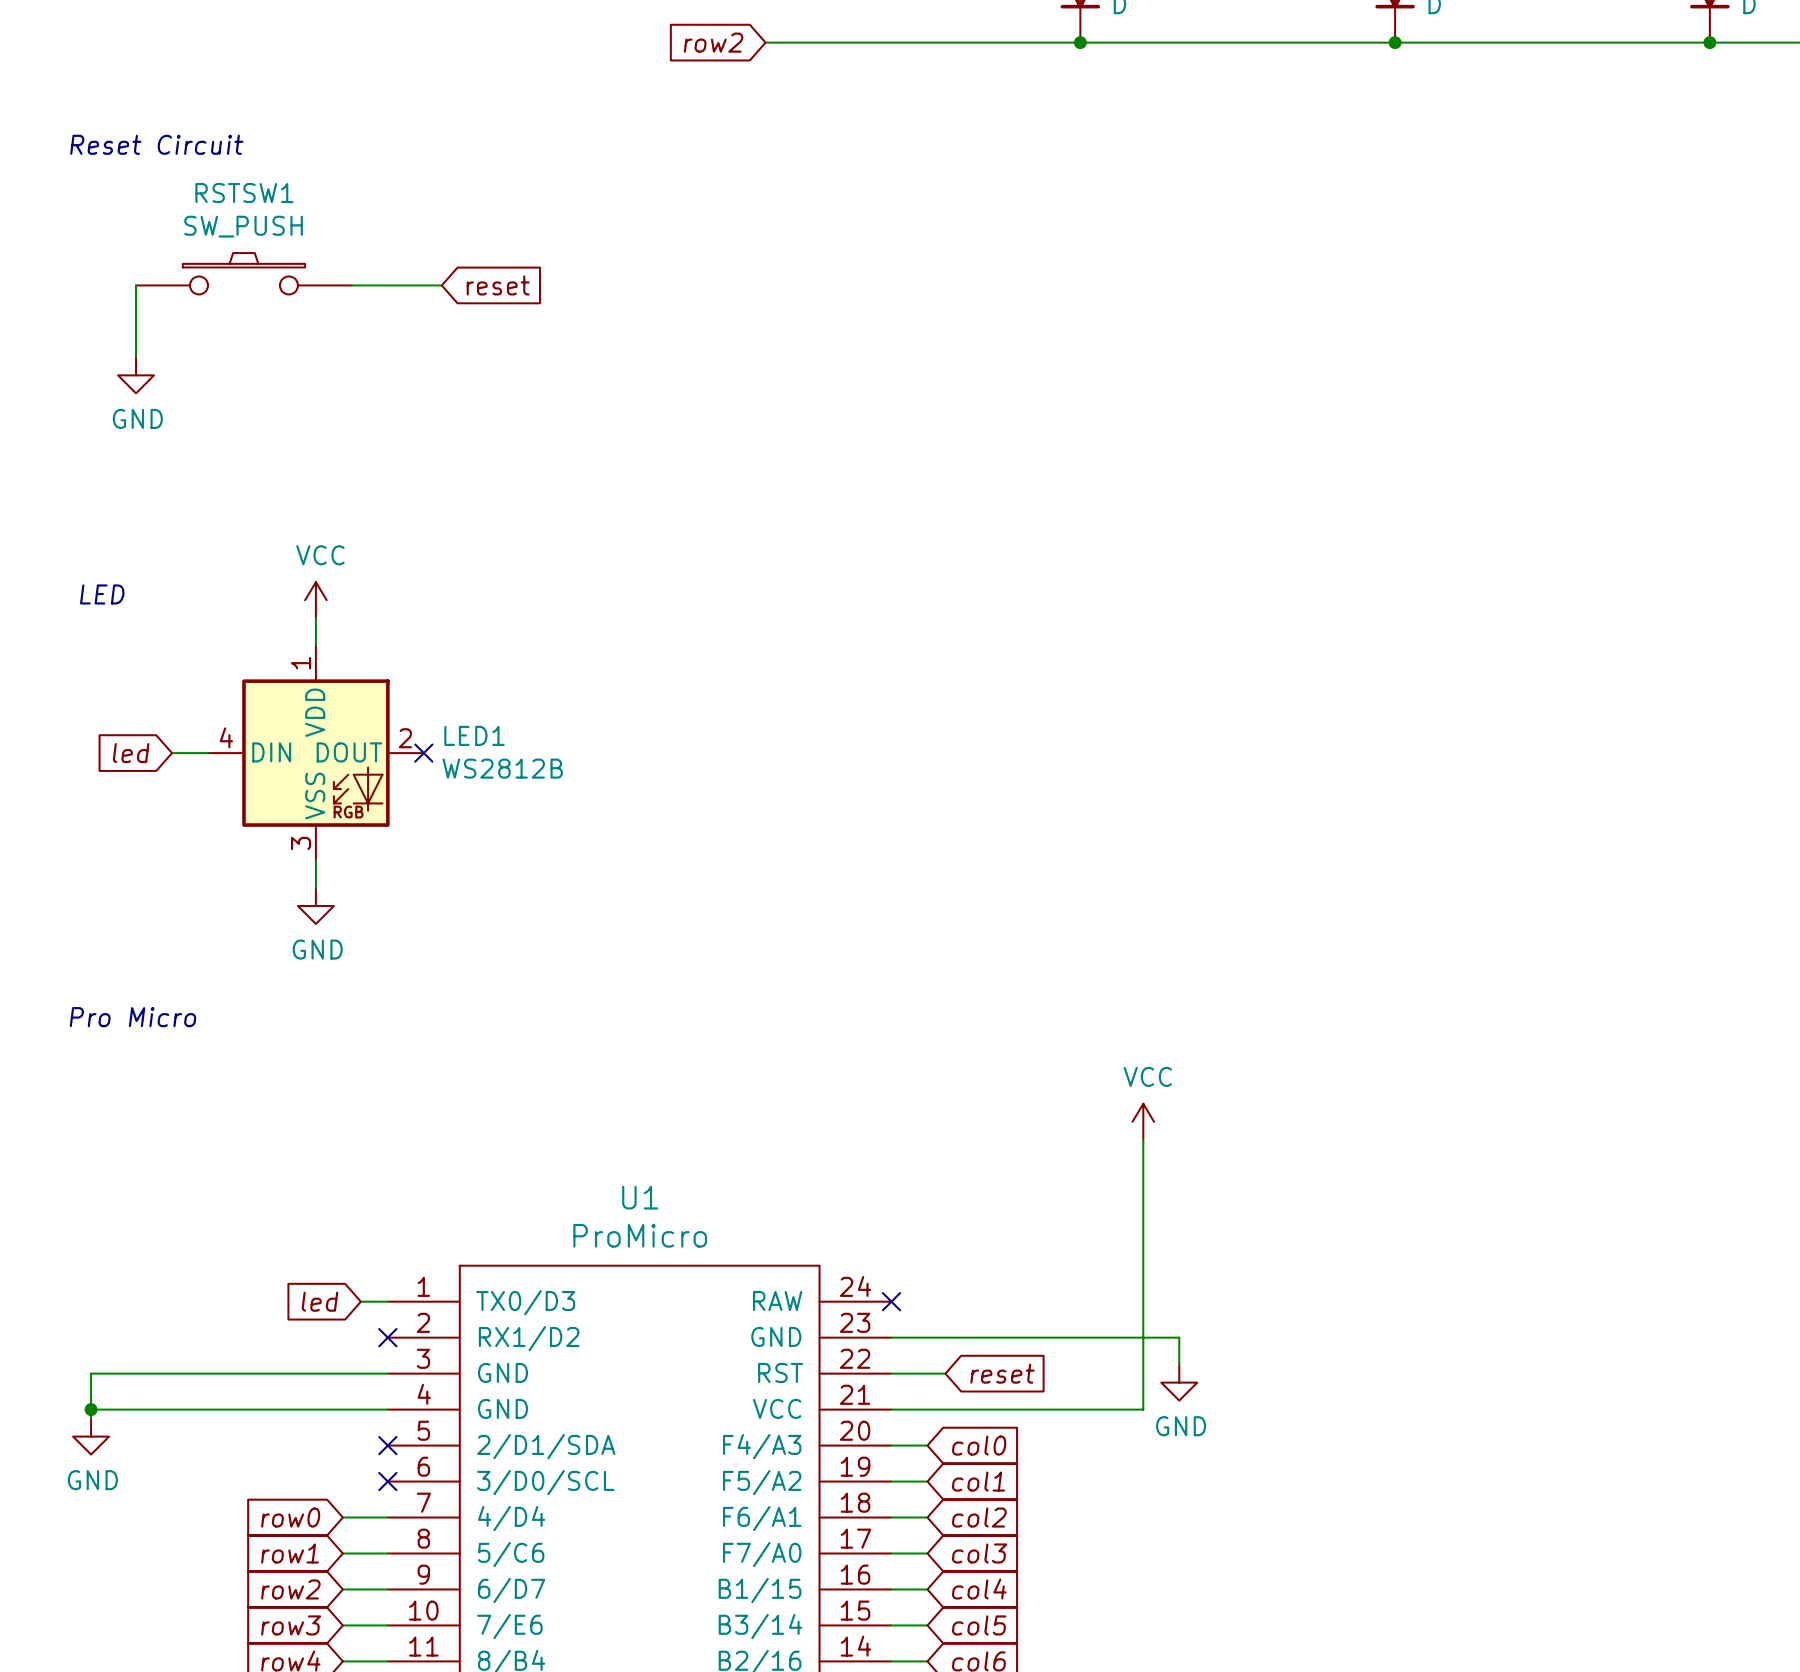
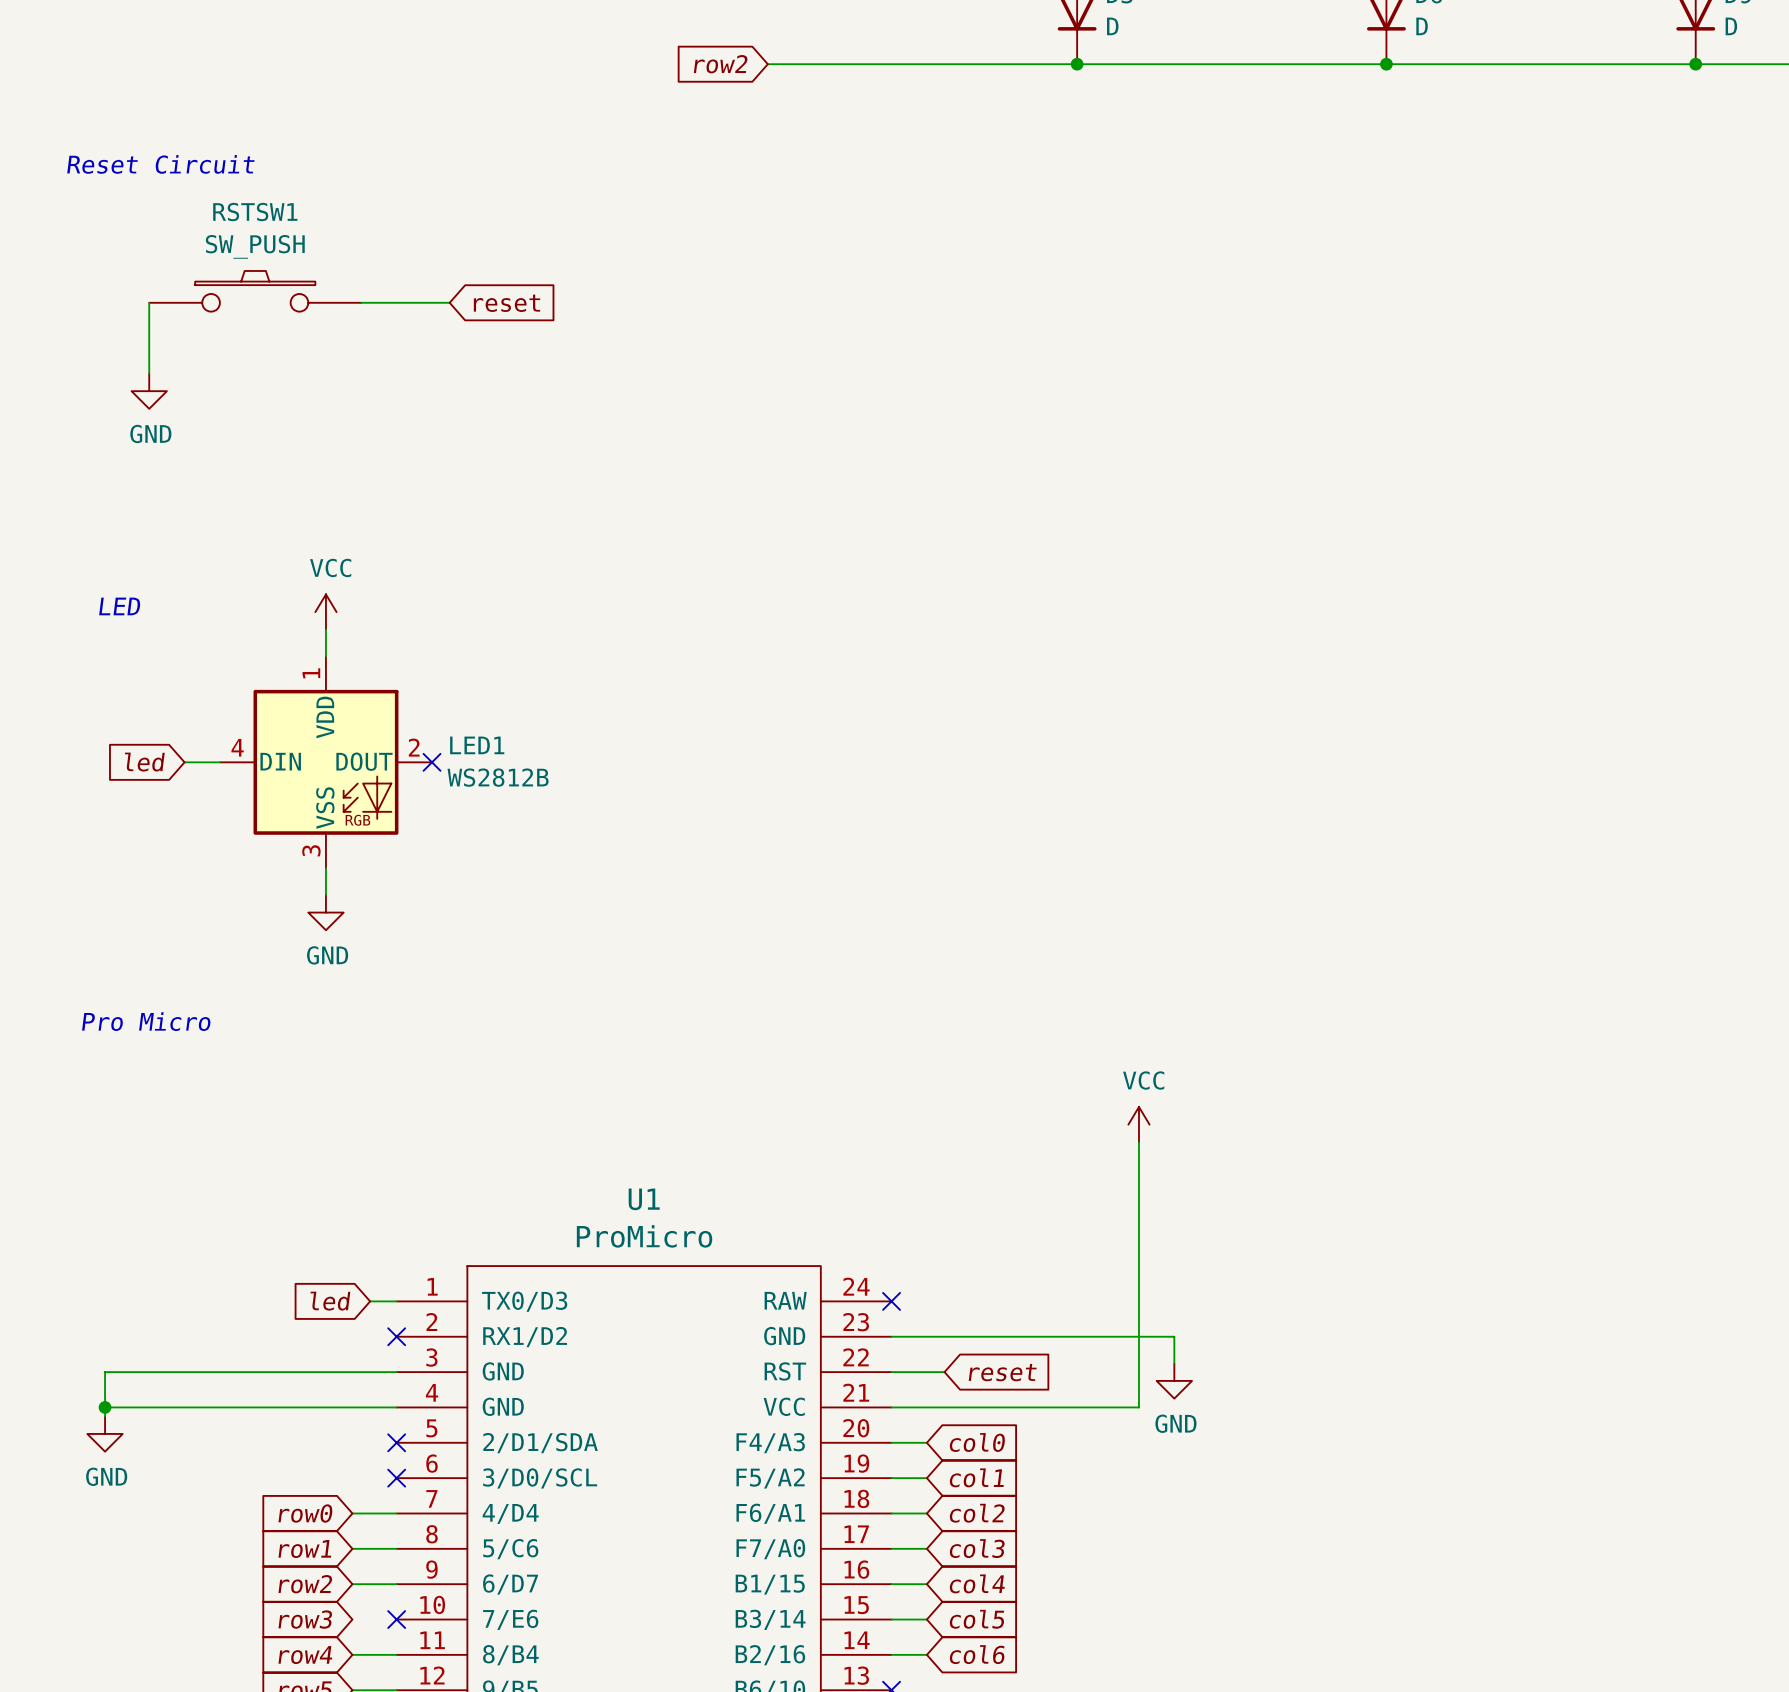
wire: (342, 1625) (387, 1625) -> none
no-connect mark: none -> (396, 1619)

